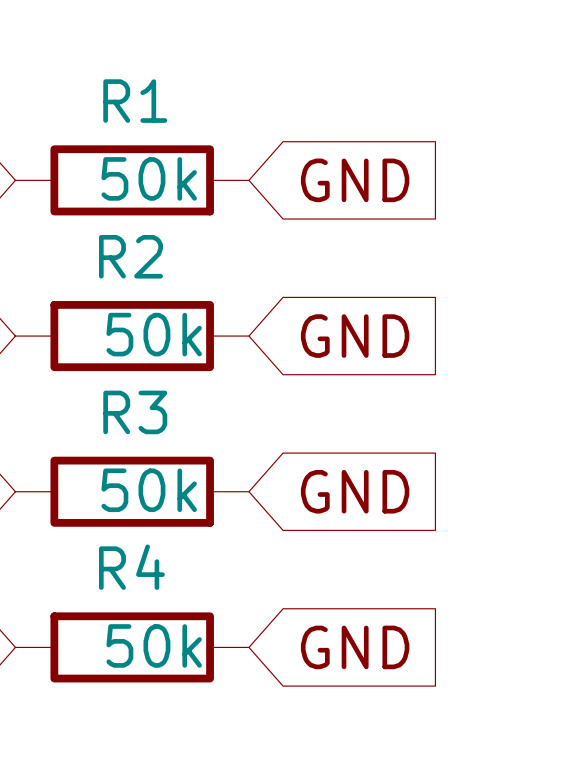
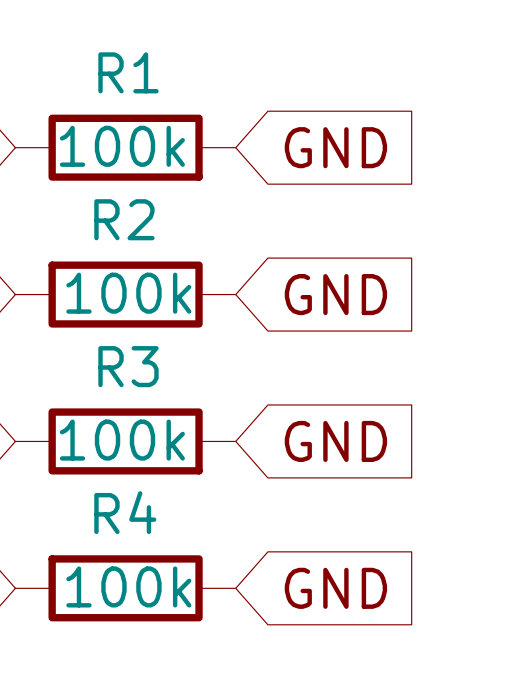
R1 value: 50k (149, 178) -> 100k (122, 146)
R2 value: 50k (154, 334) -> 100k (128, 293)
R3 value: 50k (149, 490) -> 100k (122, 440)
R4 value: 50k (154, 645) -> 100k (128, 586)

